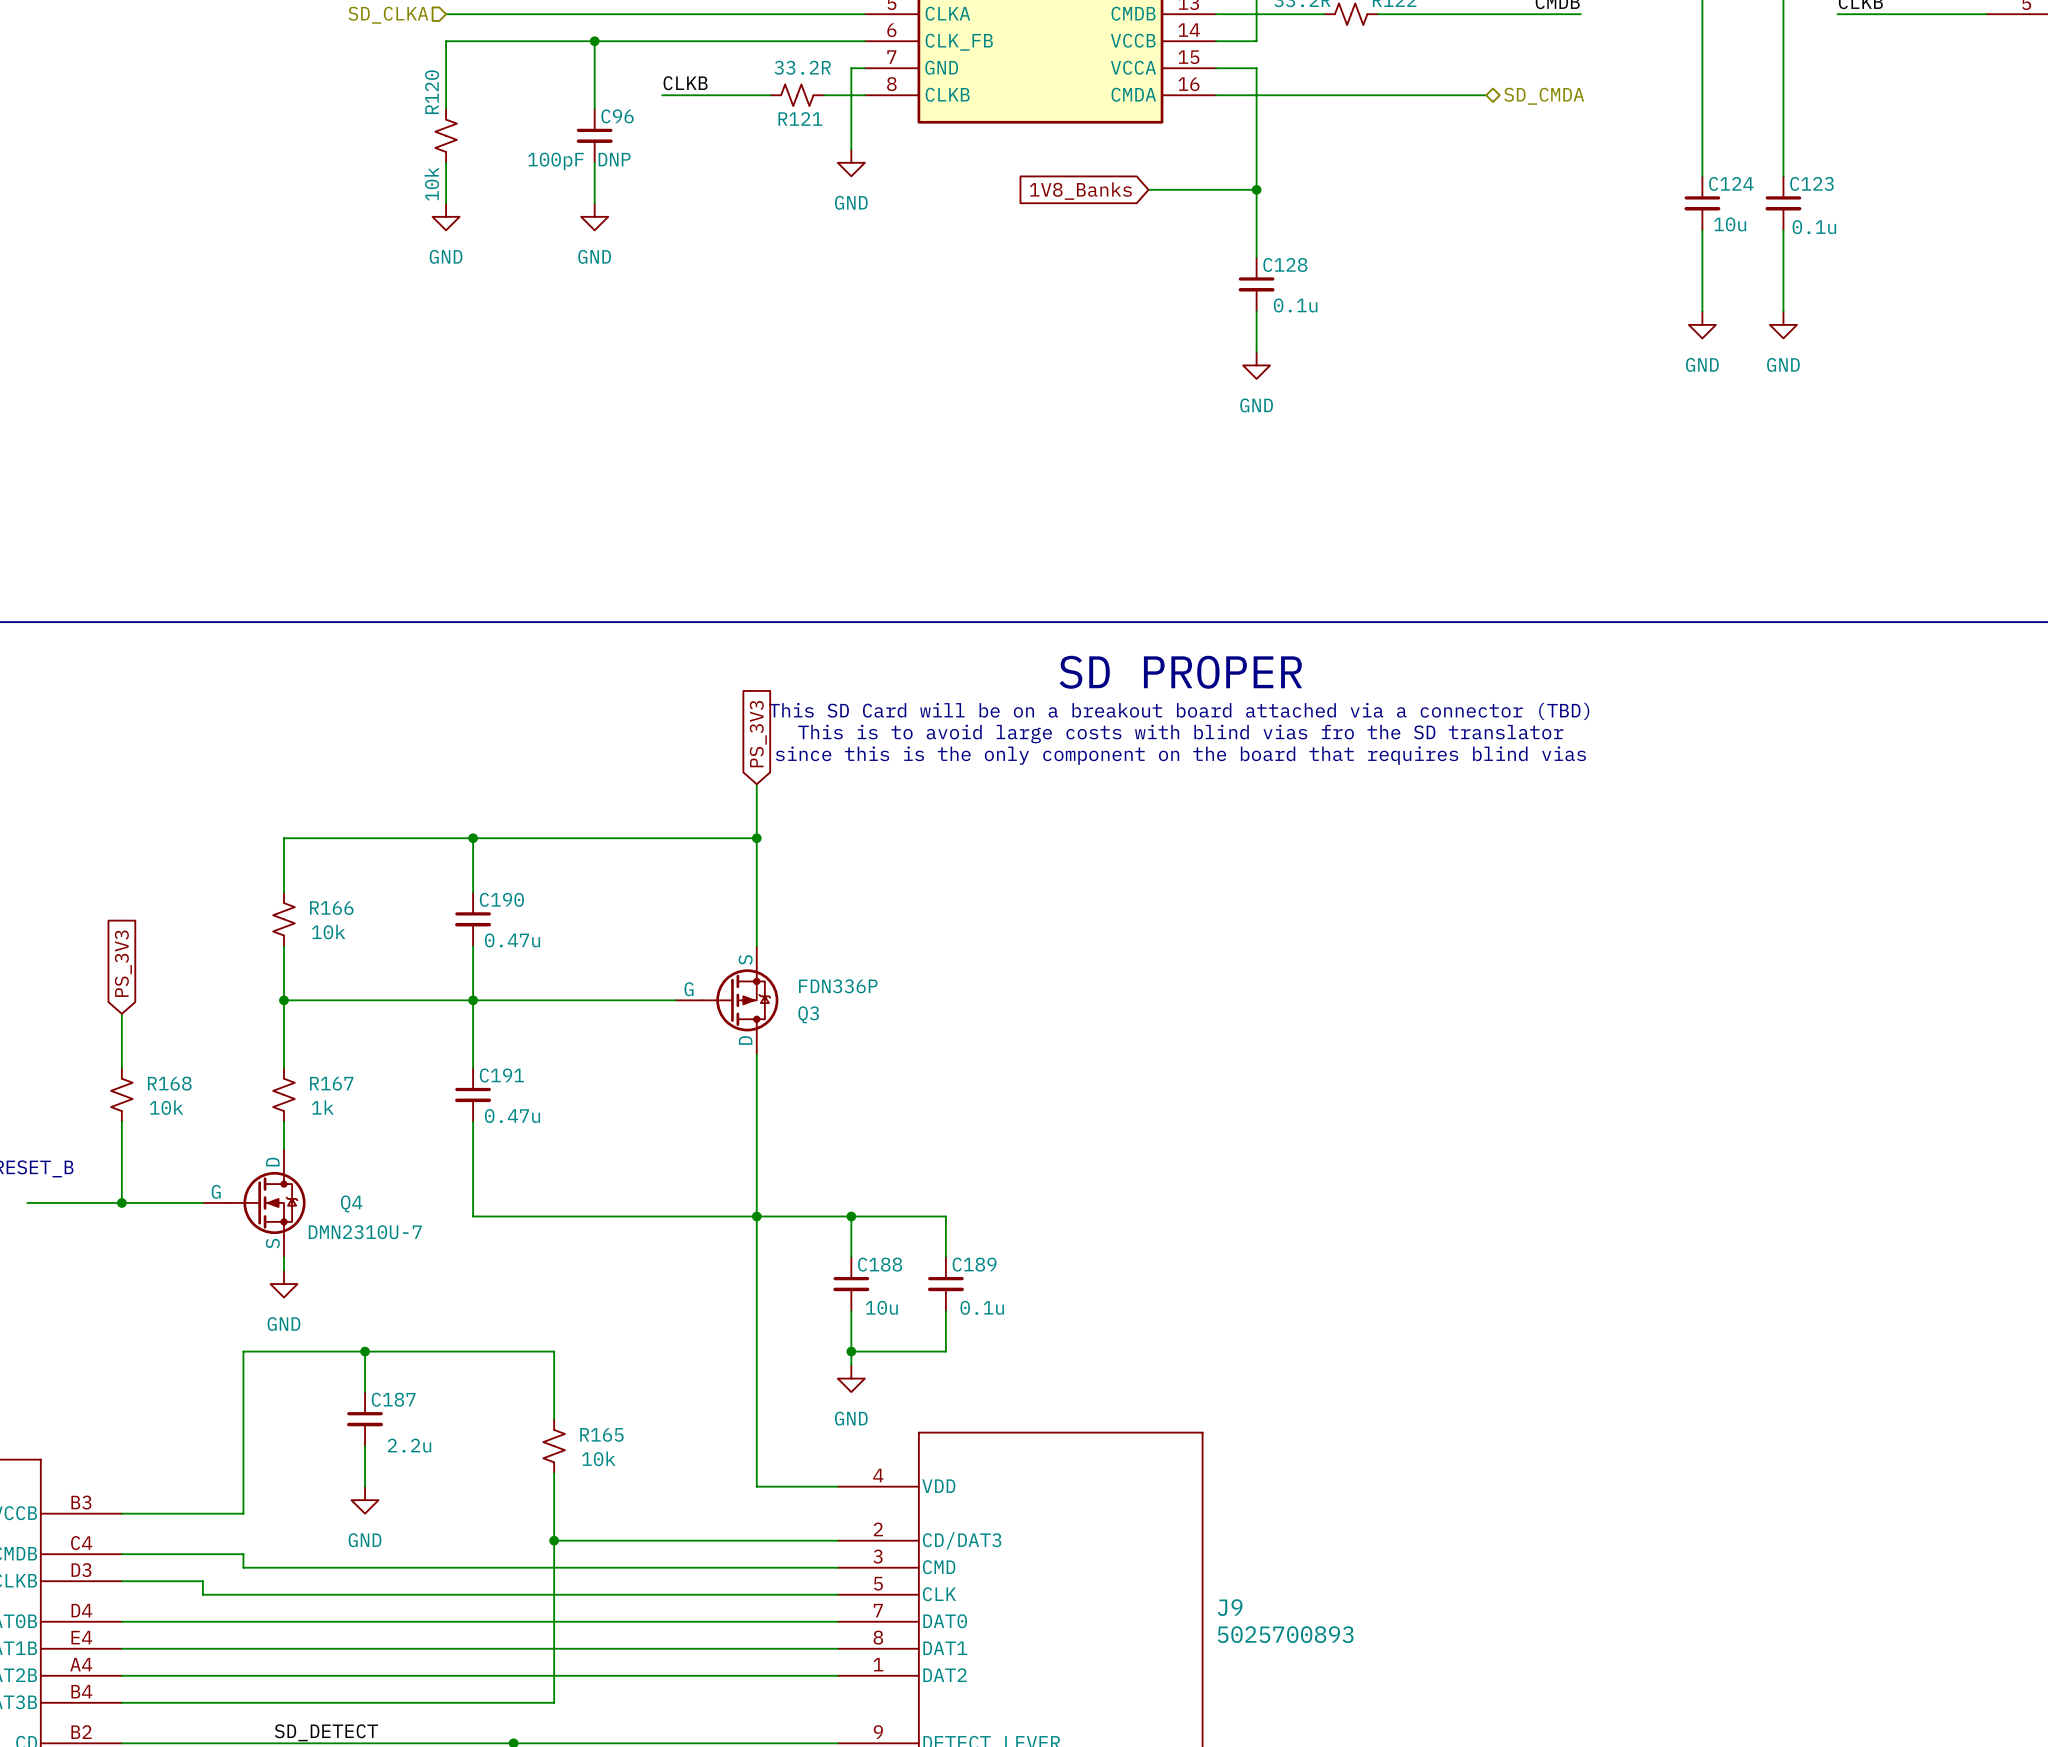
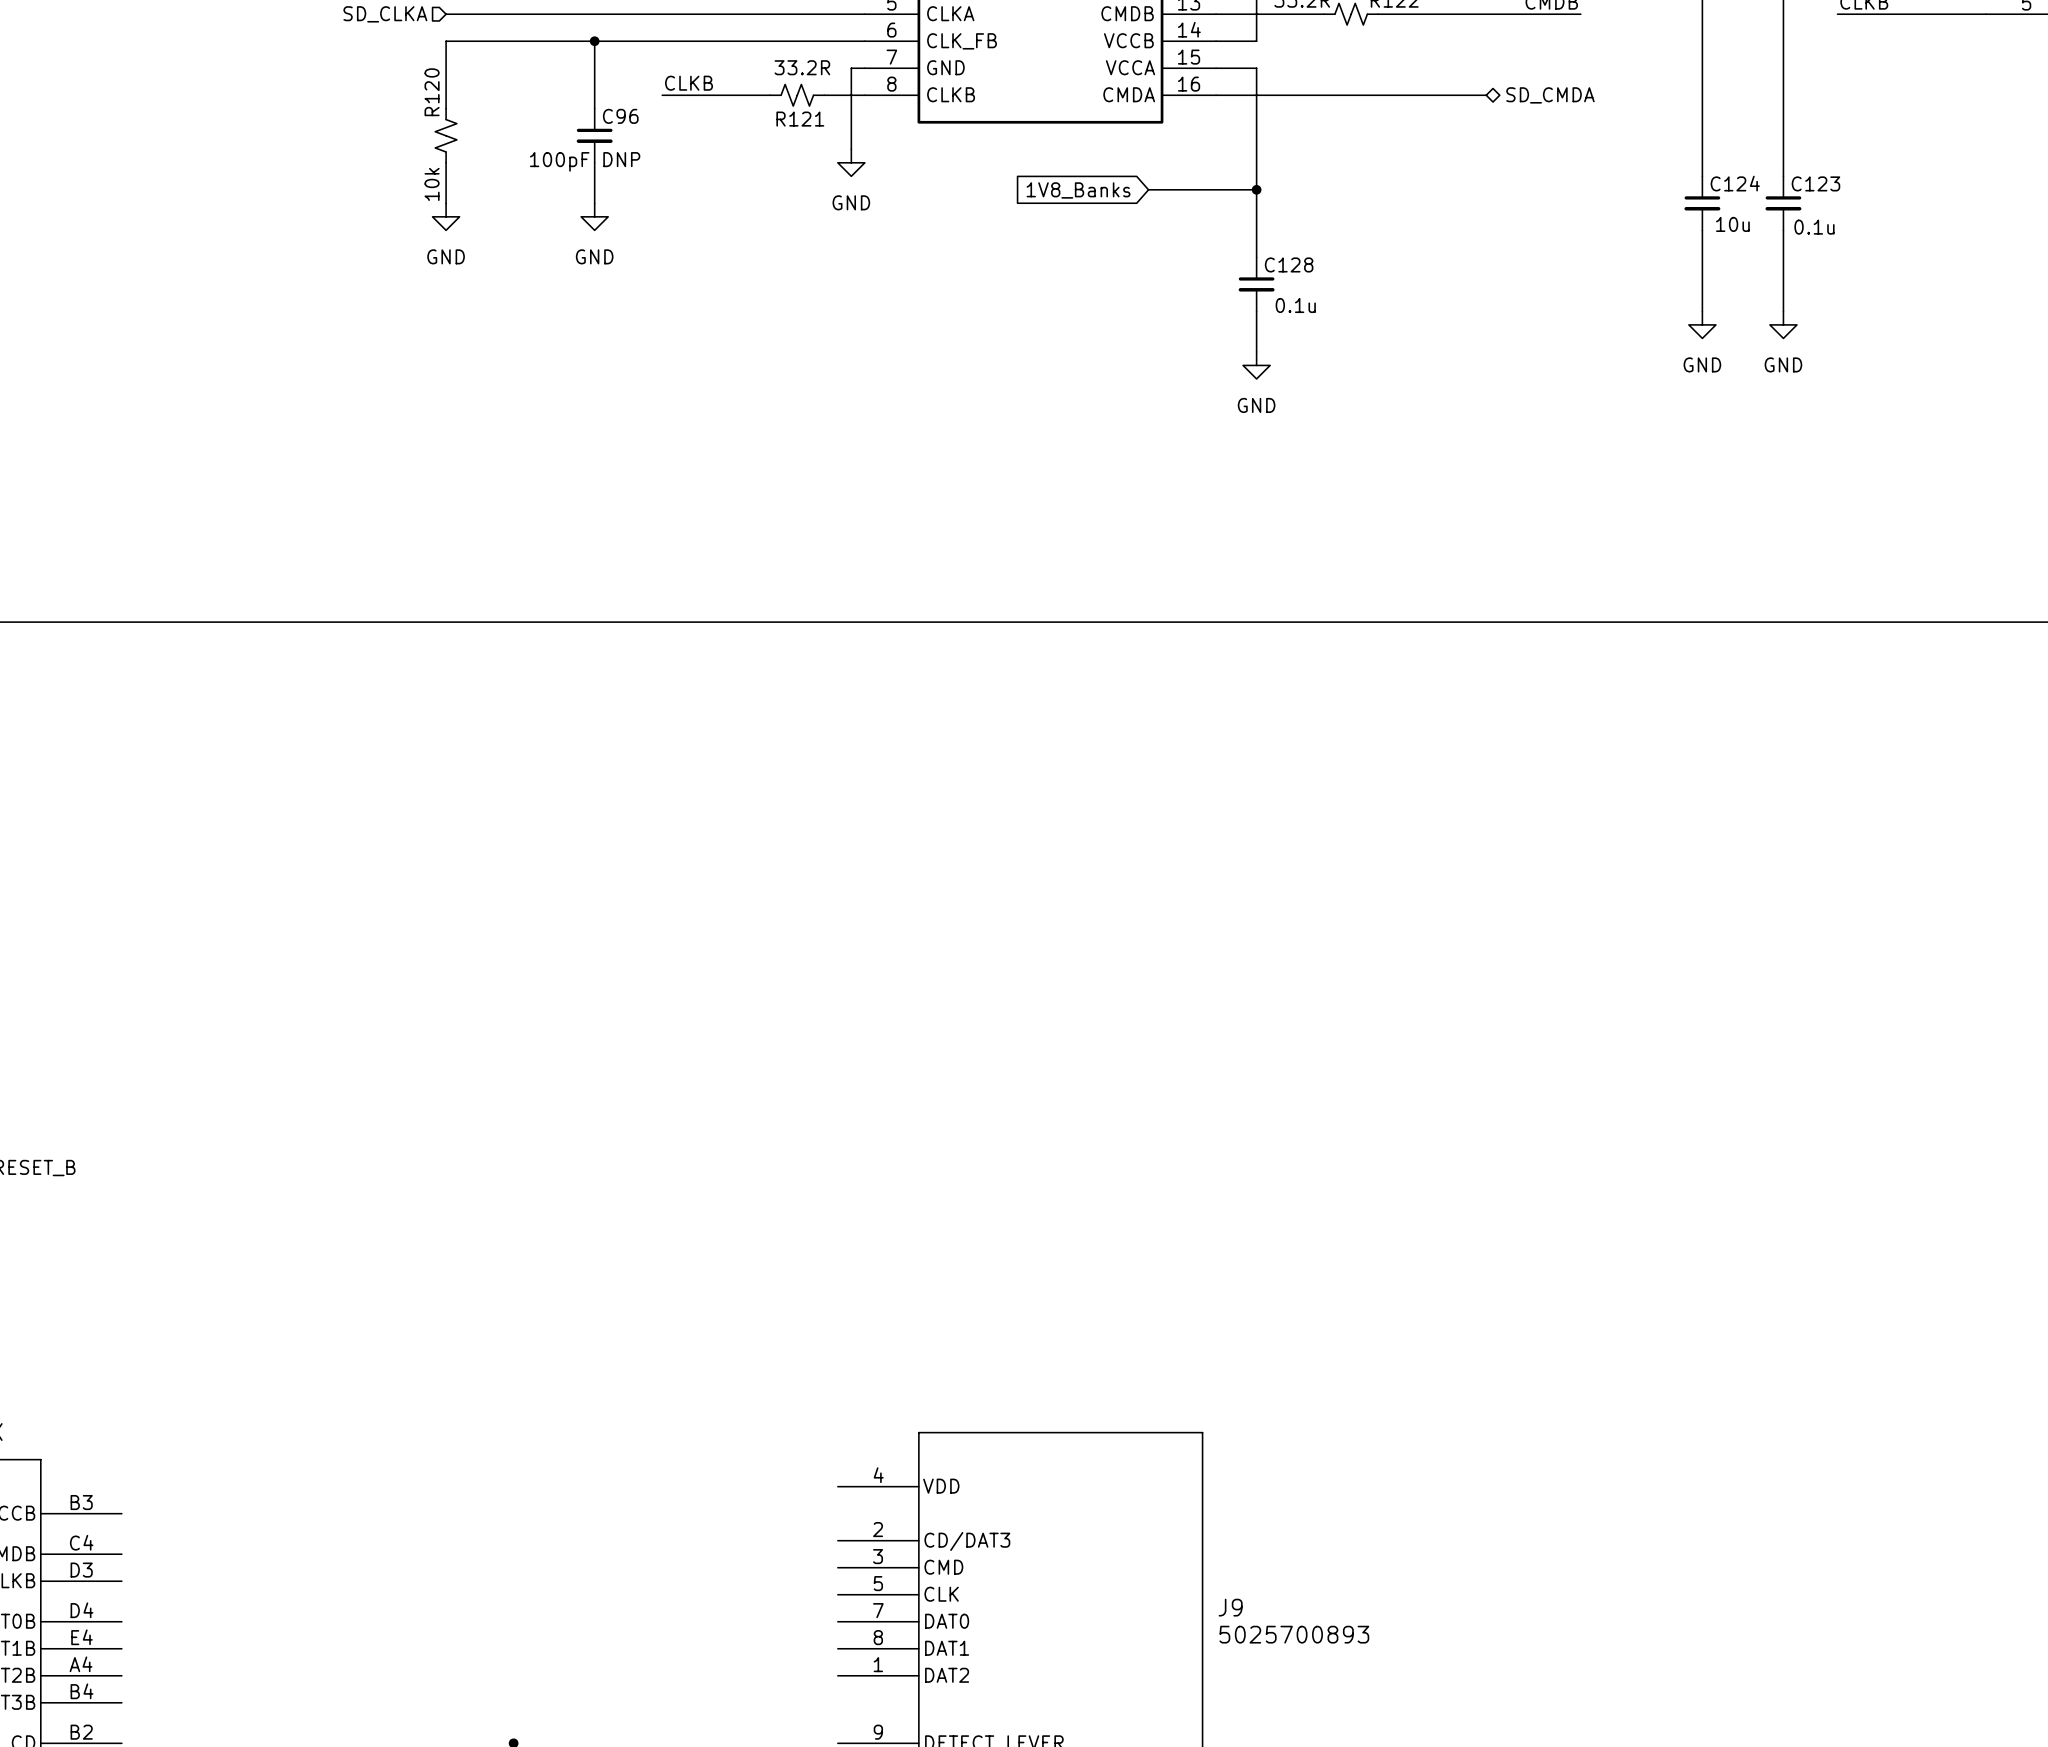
text: SD PROPER (1180, 672) -> none
text: This SD Card will be on a breakout board attached via a connector (TBD) (1179, 711) -> none
text: This is to avoid large costs with blind vias fro the SD translator (1180, 733) -> none
global label: PS_3V3 (758, 734) -> none
text: since this is the only component on the board that requires blind vias (1180, 755) -> none
wire: (756, 784) (756, 946) -> none
wire: (473, 838) (473, 892) -> none
junction: (473, 838) -> none
wire: (756, 838) (283, 838) (283, 892) -> none
junction: (756, 838) -> none
R166: 10k (283, 919) -> none
C190: 0.47u (473, 919) -> none
wire: (283, 946) (283, 1067) -> none
wire: (473, 946) (473, 1067) -> none
global label: PS_3V3 (123, 963) -> none
wire: (283, 1000) (675, 1000) -> none
junction: (283, 1000) -> none
junction: (473, 1000) -> none
Q3: FDN336P (727, 1000) -> none
wire: (121, 1013) (121, 1067) -> none
wire: (756, 1054) (756, 1486) (837, 1486) -> none
R168: 10k (121, 1094) -> none
R167: 1k (283, 1094) -> none
C191: 0.47u (473, 1094) -> none
wire: (121, 1121) (121, 1202) -> none
wire: (283, 1121) (283, 1148) -> none
wire: (473, 1121) (473, 1216) (945, 1216) (945, 1257) -> none
wire: (27, 1202) (202, 1202) -> none
junction: (121, 1202) -> none
Q4: DMN2310U-7 (254, 1202) -> none
junction: (756, 1216) -> none
wire: (851, 1216) (851, 1257) -> none
junction: (851, 1216) -> none
wire: (283, 1257) (283, 1270) -> none
power symbol: GND (283, 1284) -> none
C188: 10u (851, 1284) -> none
C189: 0.1u (945, 1284) -> none
wire: (851, 1311) (851, 1365) -> none
wire: (945, 1311) (945, 1351) (851, 1351) -> none
wire: (365, 1351) (365, 1392) -> none
junction: (365, 1351) -> none
junction: (851, 1351) -> none
power symbol: GND (851, 1378) -> none
C187: 2.2u (365, 1419) -> none
wire: (554, 1419) (554, 1351) (243, 1351) (243, 1513) (121, 1513) -> none
wire: (365, 1446) (365, 1486) -> none
R165: 10k (554, 1446) -> none
wire: (554, 1473) (554, 1702) (121, 1702) -> none
power symbol: GND (365, 1500) -> none
wire: (554, 1540) (837, 1540) -> none
junction: (554, 1540) -> none
wire: (121, 1554) (243, 1554) (243, 1567) (837, 1567) -> none
wire: (121, 1581) (202, 1581) (202, 1594) (837, 1594) -> none
wire: (121, 1621) (837, 1621) -> none
wire: (121, 1648) (837, 1648) -> none
wire: (121, 1675) (837, 1675) -> none
label: SD_DETECT (326, 1732) -> none
wire: (121, 1743) (837, 1743) -> none

